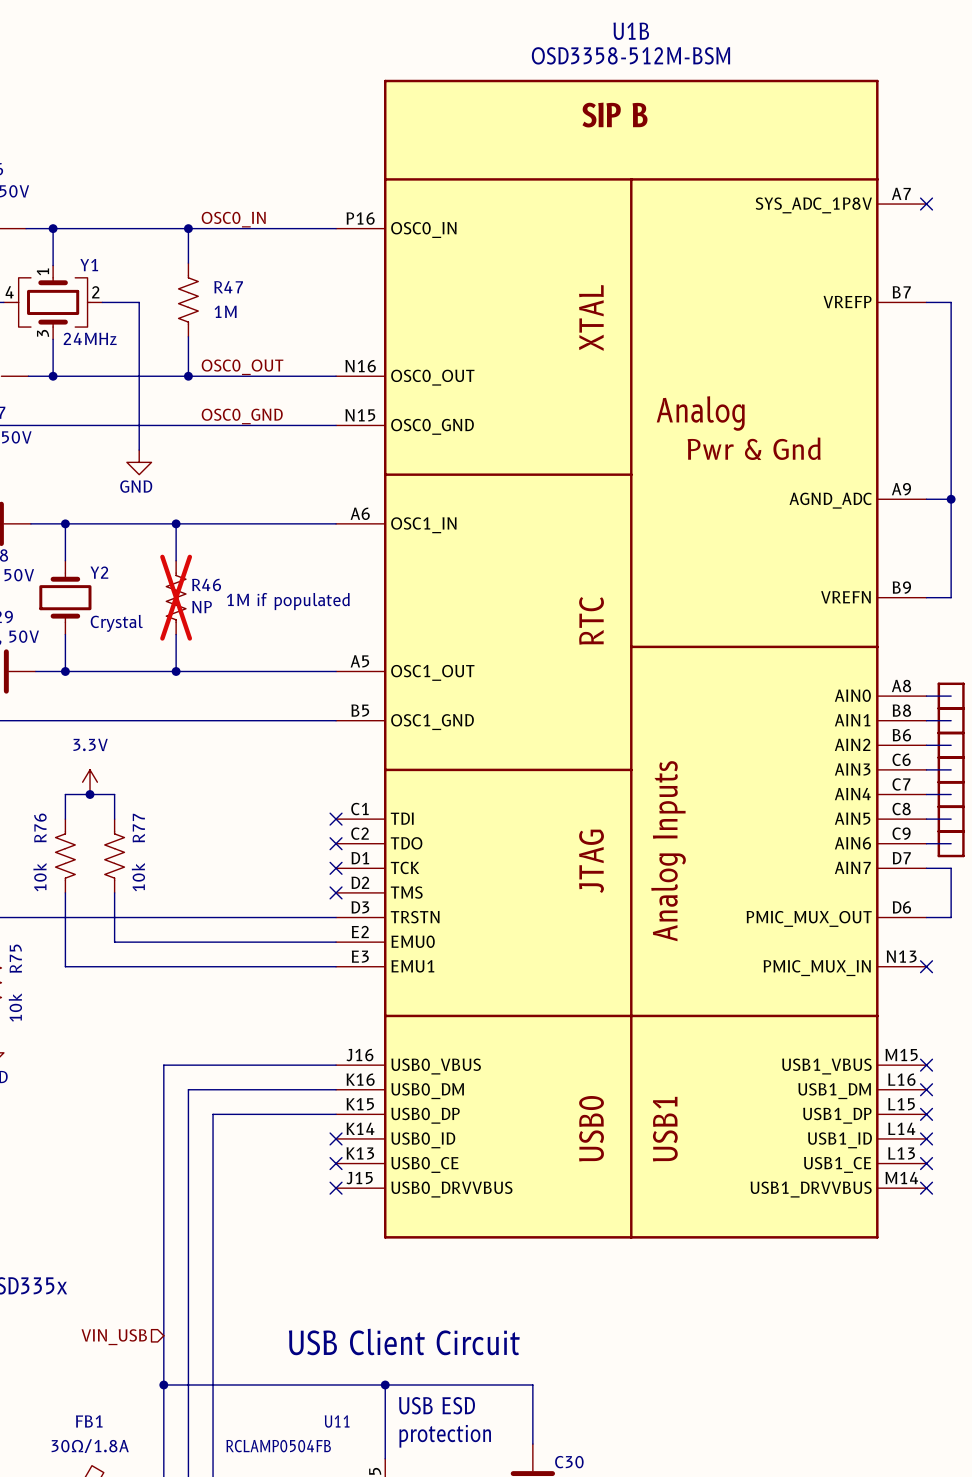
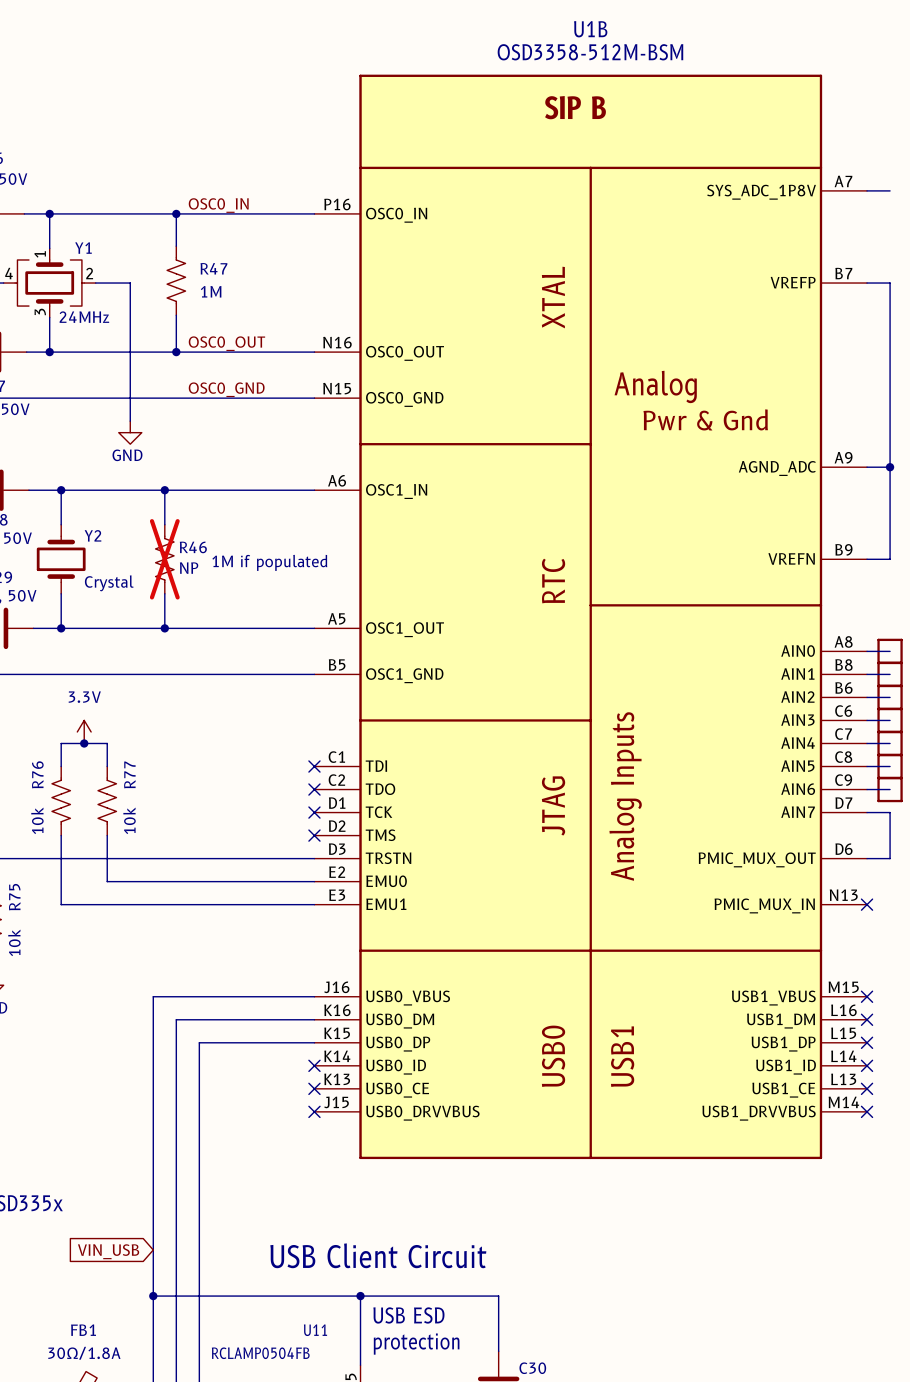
wire: none -> (867, 190) (890, 190)
no-connect mark: (926, 204) -> none
hierarchical label: VIN_USB (114, 1337) -> none
global label: none -> VIN_USB (108, 1251)

